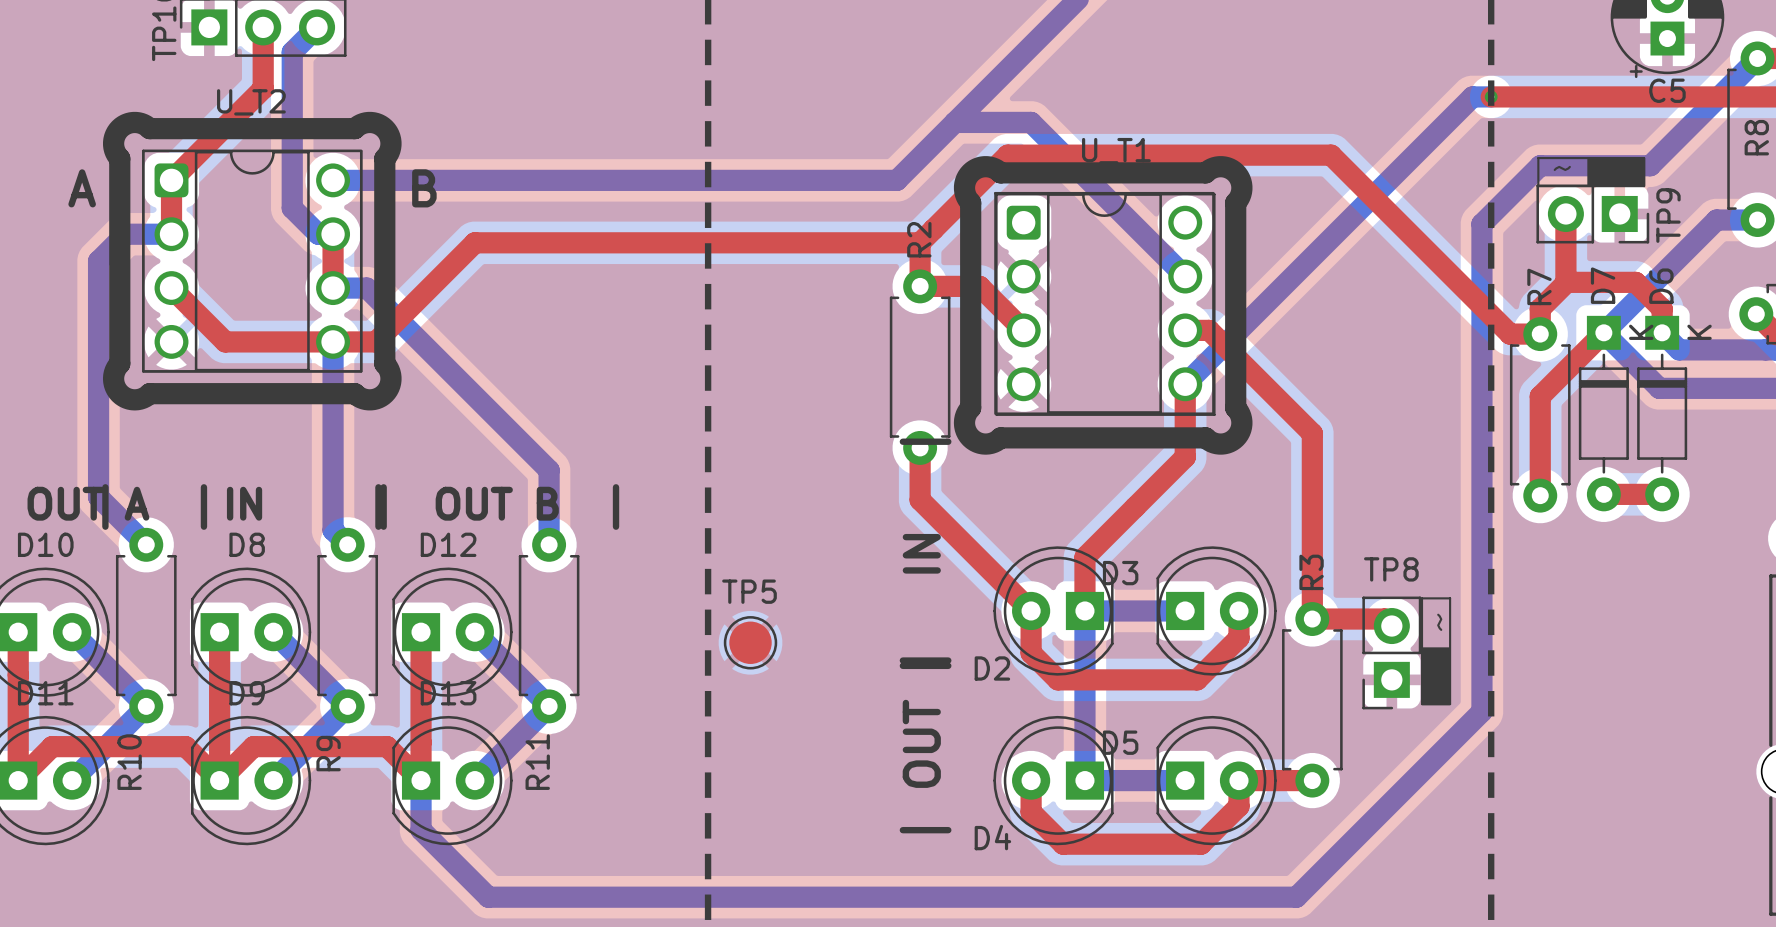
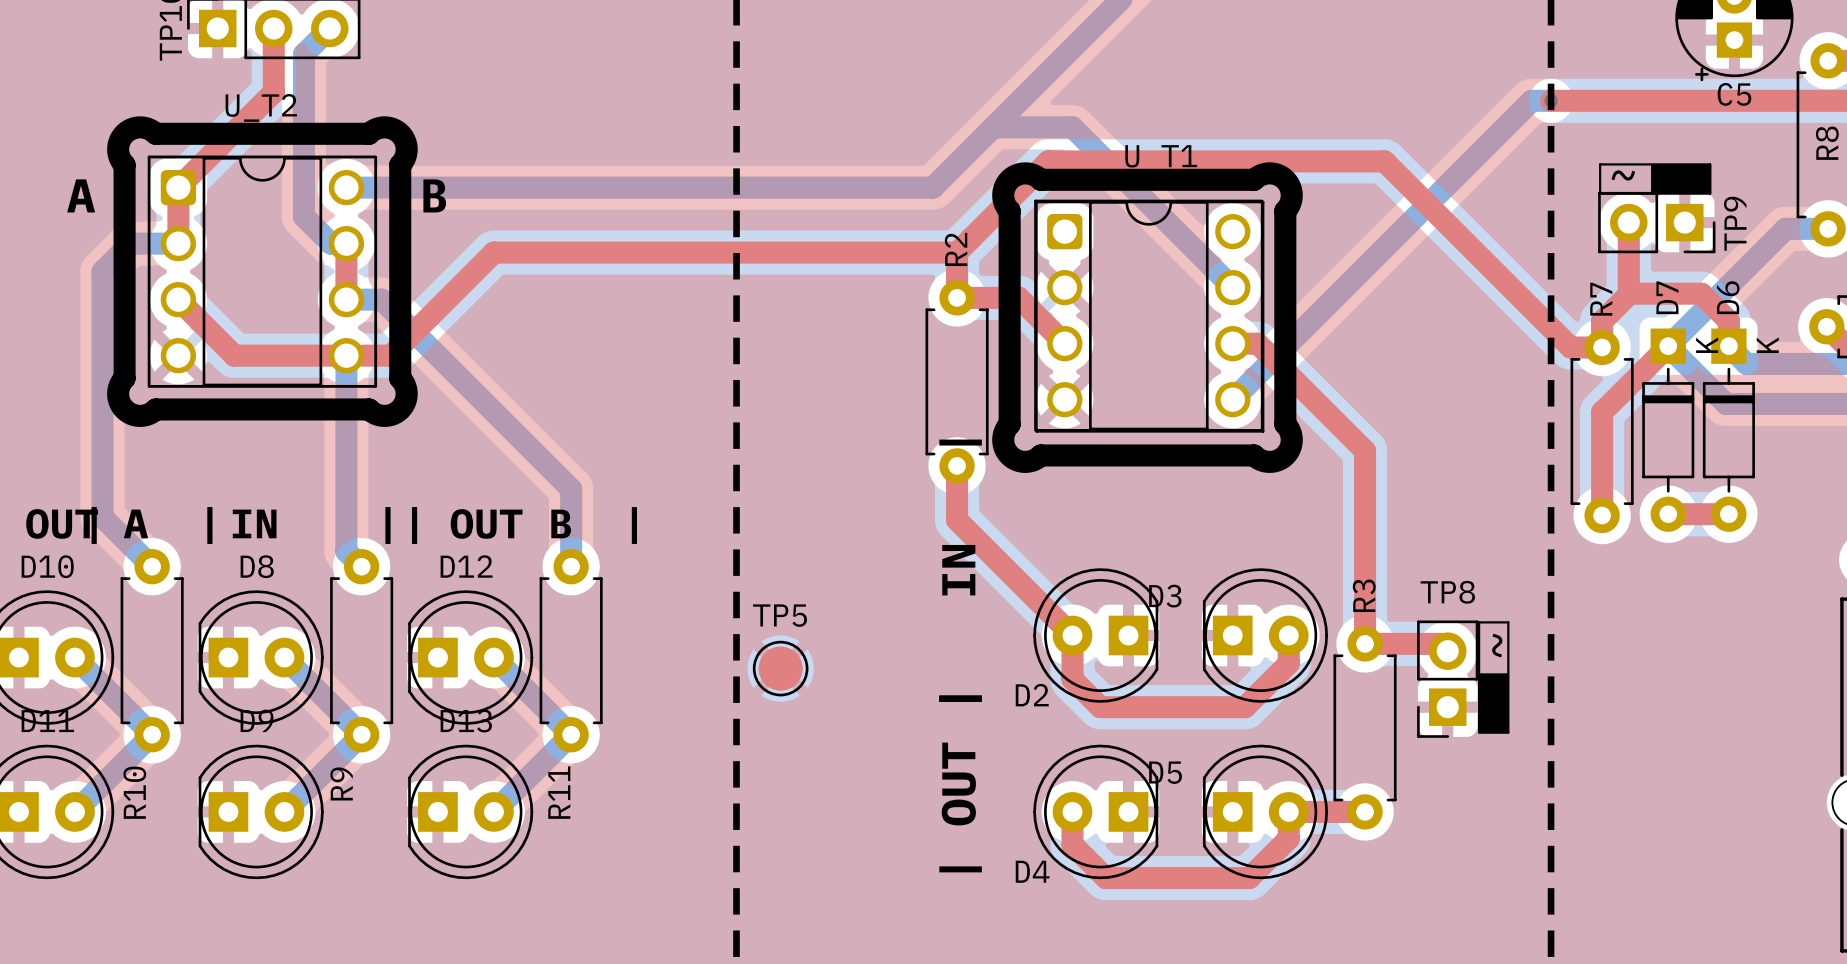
bottom track: (1757, 58) (1650, 165) (1540, 165) (1481, 224) (1481, 711) (1296, 897) (488, 897) (421, 829) (421, 780) -> none
top track: (1185, 384) (1185, 457) (1084, 557) (1084, 610) -> none
bottom track: (1185, 610) (1084, 610) (1084, 780) (1185, 780) -> none
top track: (18, 632) (18, 780) (52, 746) (185, 746) (219, 780) -> none
top track: (219, 632) (219, 780) -> none
top track: (421, 632) (421, 780) (387, 746) (253, 746) (219, 780) -> none

